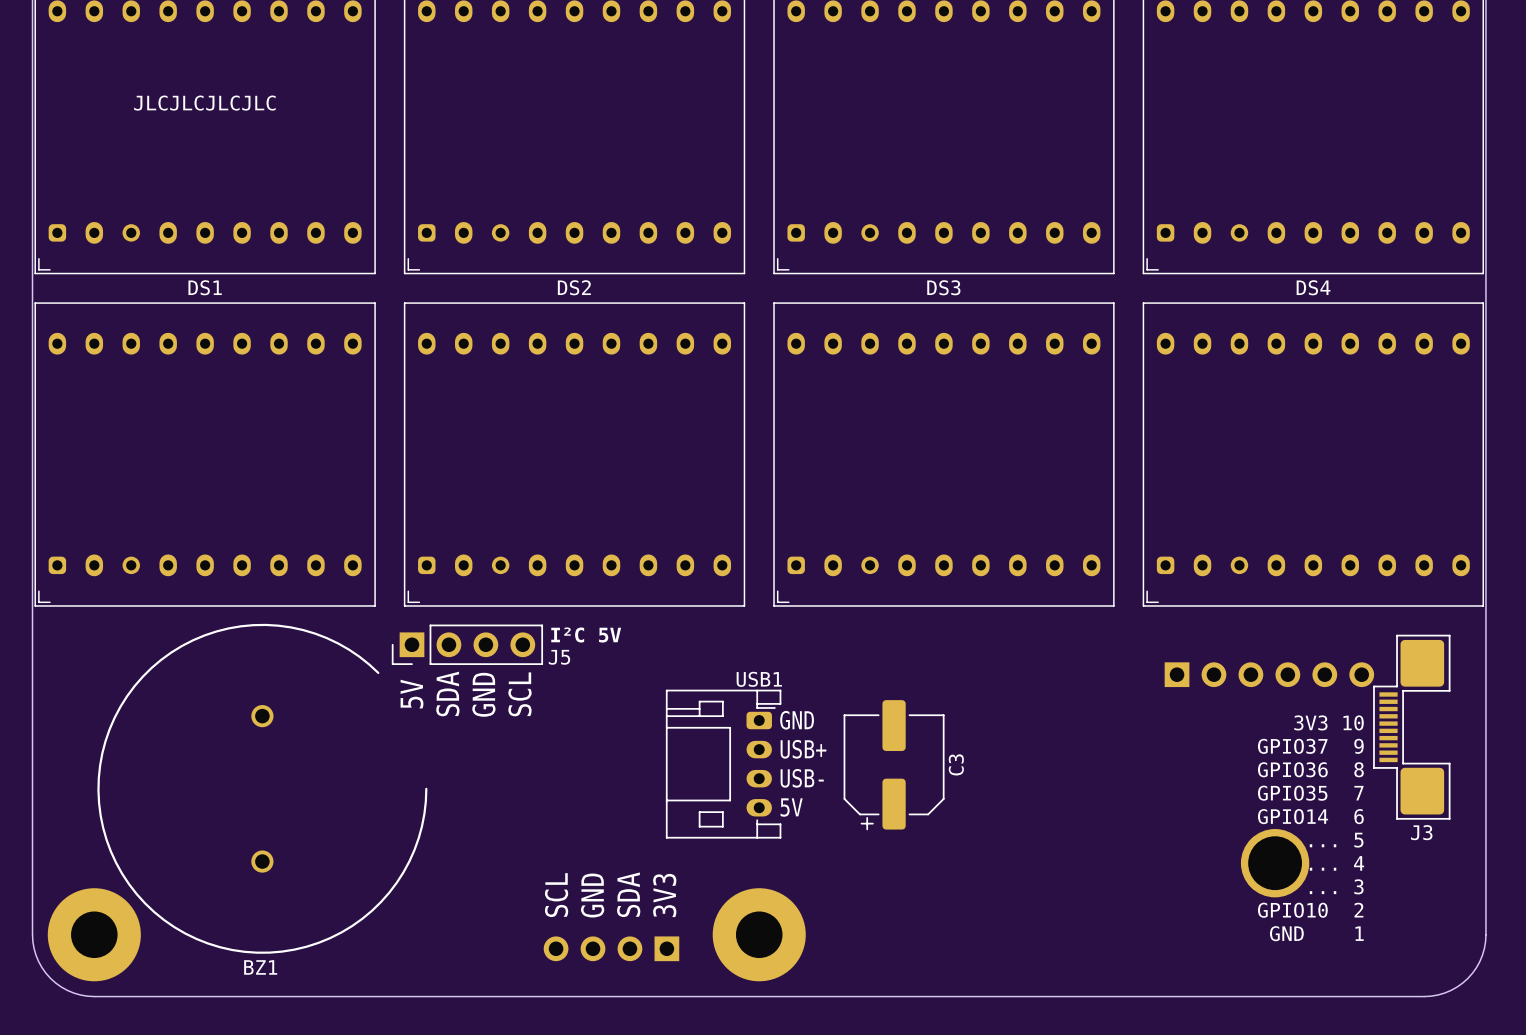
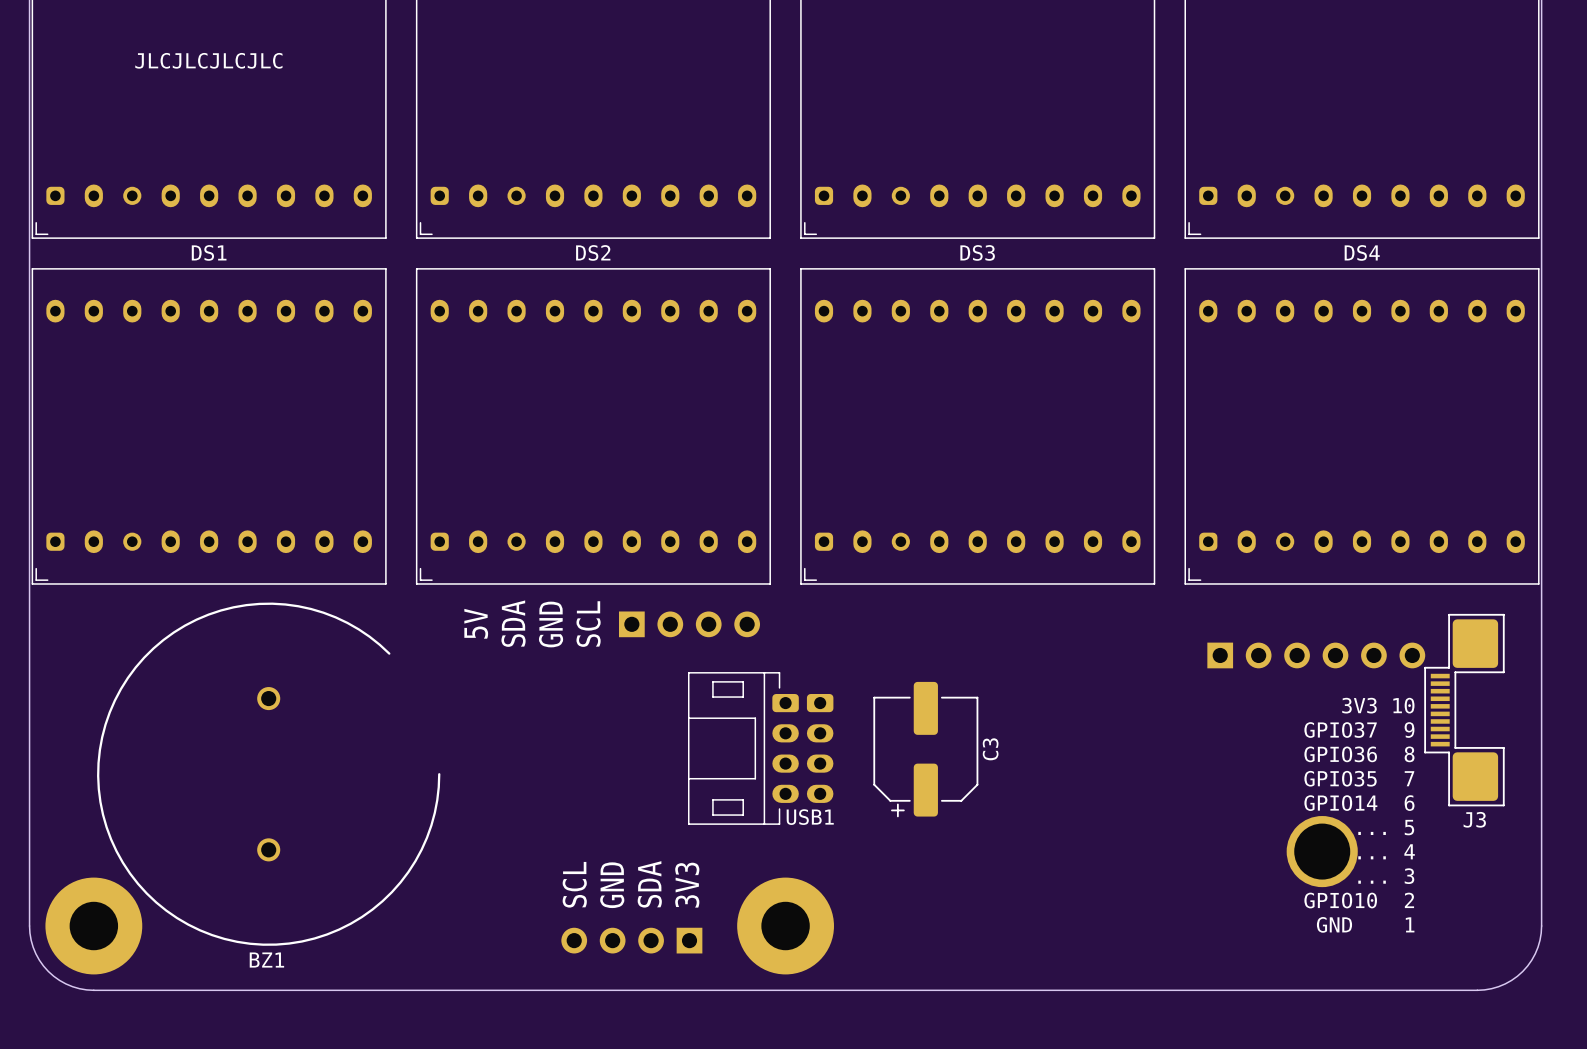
J5 side: top (467, 644) -> bottom (689, 624)
USB1 name position: USB1 (759, 679) -> USB1 (810, 817)
USB1 footprint: [665, 689, 782, 839] -> [687, 672, 799, 825]
text position: SDA (447, 693) -> SDA (513, 623)
text position: 5V (412, 694) -> 5V (476, 623)
text position: GND (483, 694) -> GND (551, 624)
text position: SCL (519, 694) -> SCL (588, 624)
text: GND (797, 720) -> none
text: USB+ (803, 749) -> none
part: none -> (820, 748)
text: USB- (802, 778) -> none
text: 5V (791, 807) -> none

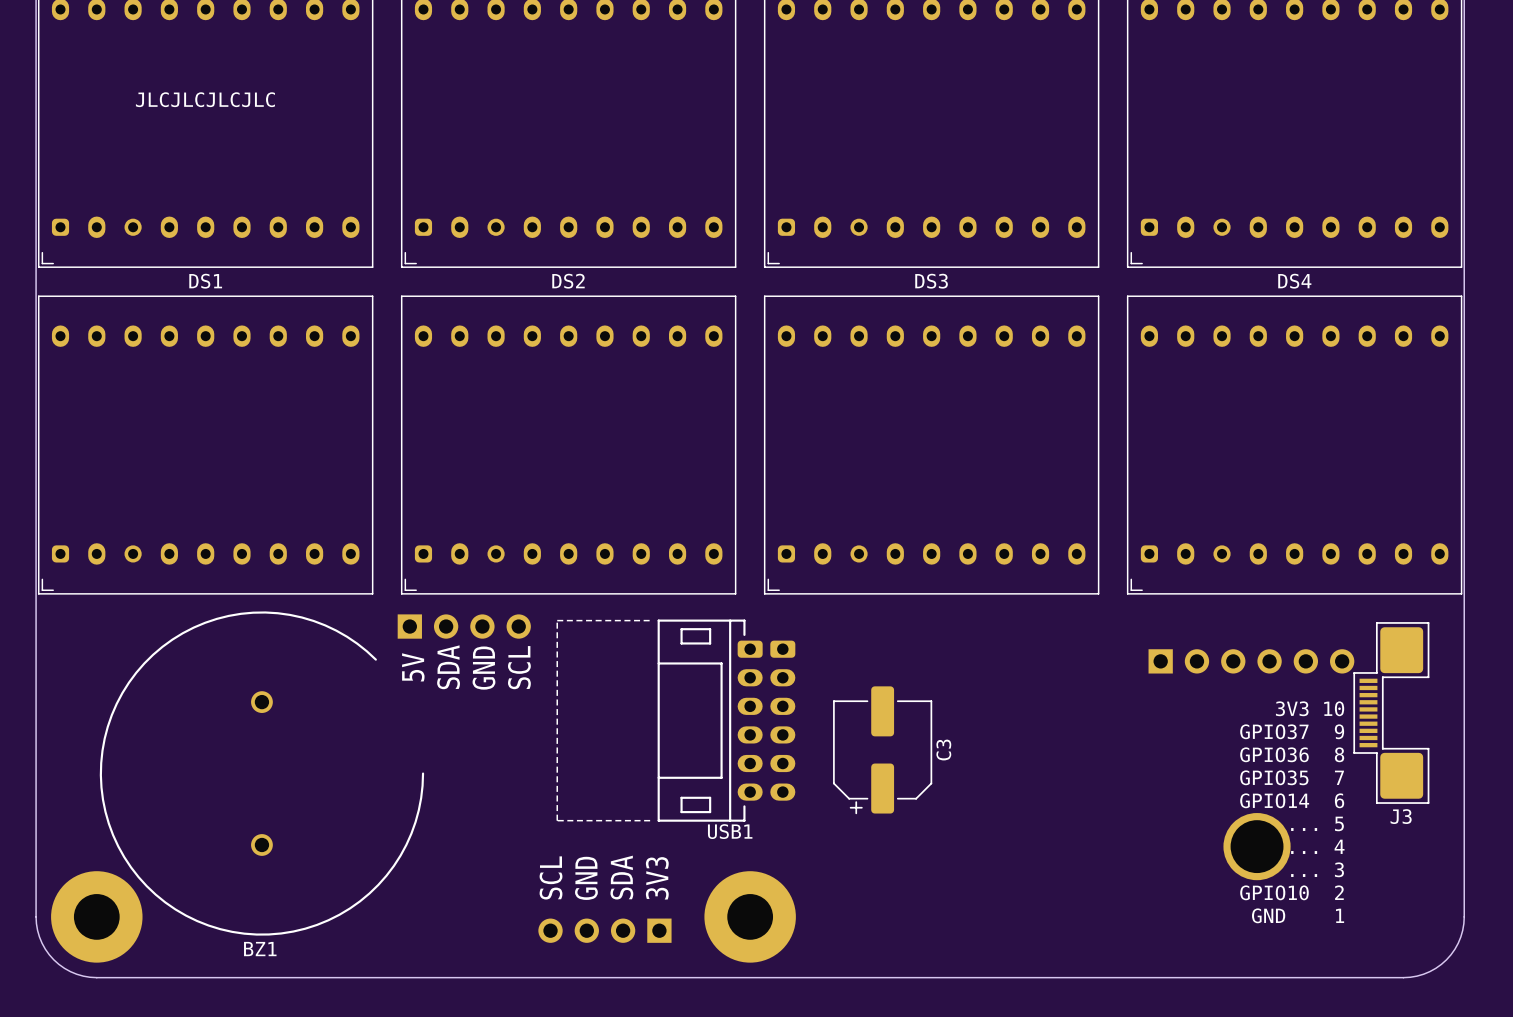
text position: 5V (476, 623) -> 5V (413, 667)
text position: SDA (513, 623) -> SDA (448, 667)
text position: GND (551, 624) -> GND (483, 668)
text position: SCL (588, 624) -> SCL (519, 667)
part position: (689, 624) -> (464, 626)
USB1 footprint: [687, 672, 799, 825] -> [556, 619, 763, 822]
part: none -> (782, 720)
part: (820, 748) -> none
USB1 name position: USB1 (810, 817) -> USB1 (730, 831)

